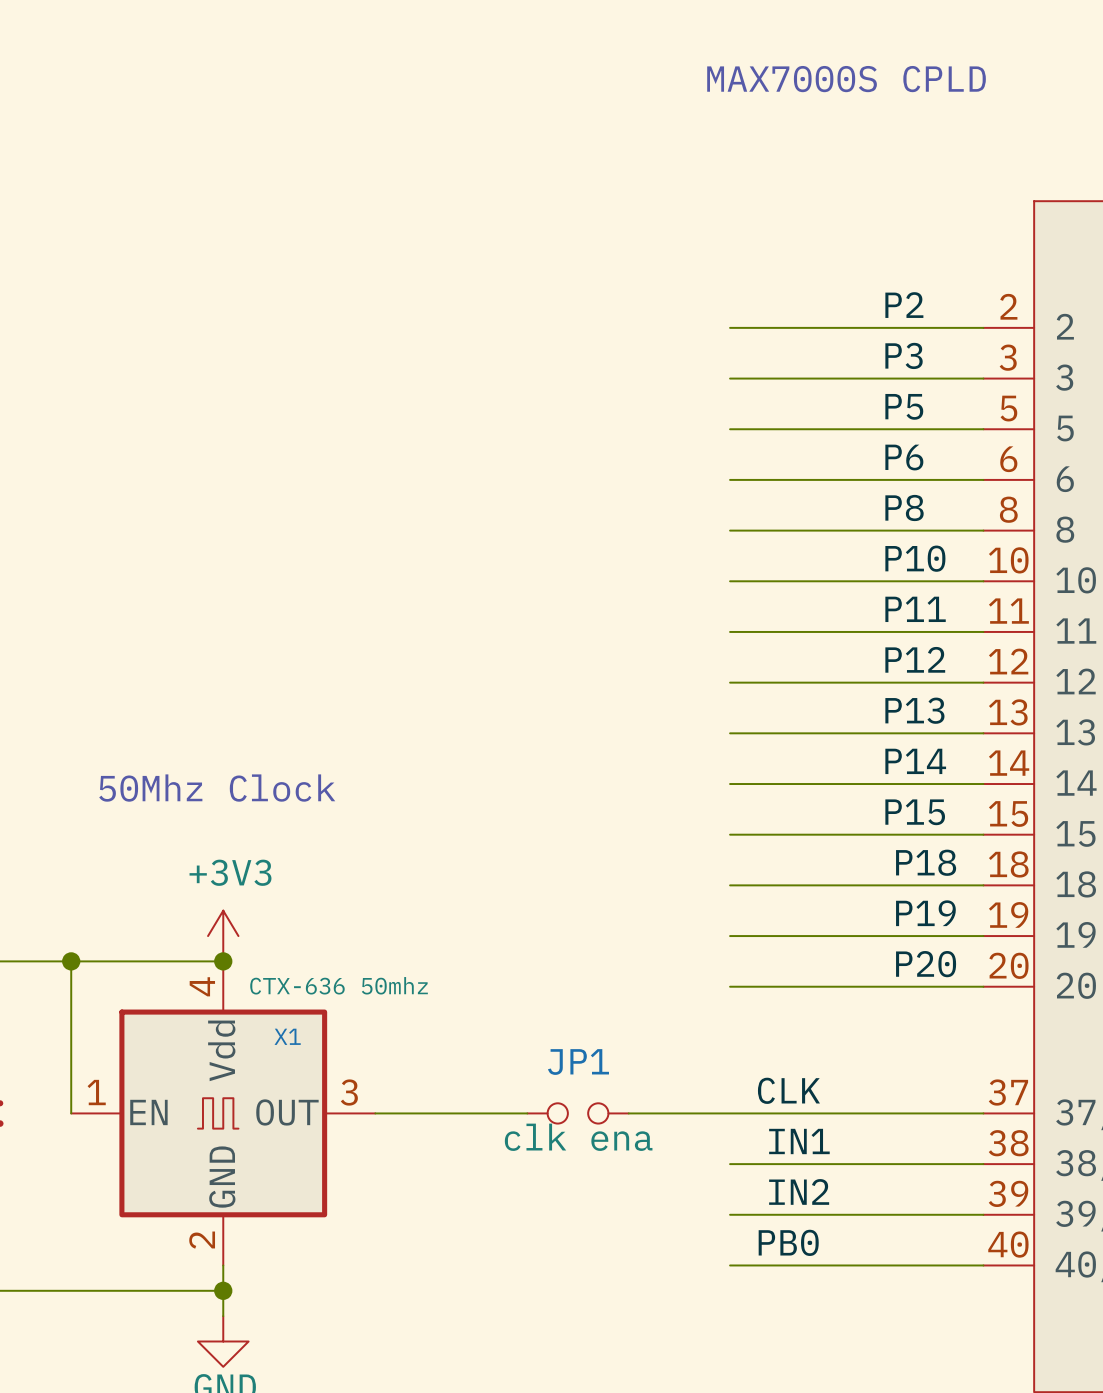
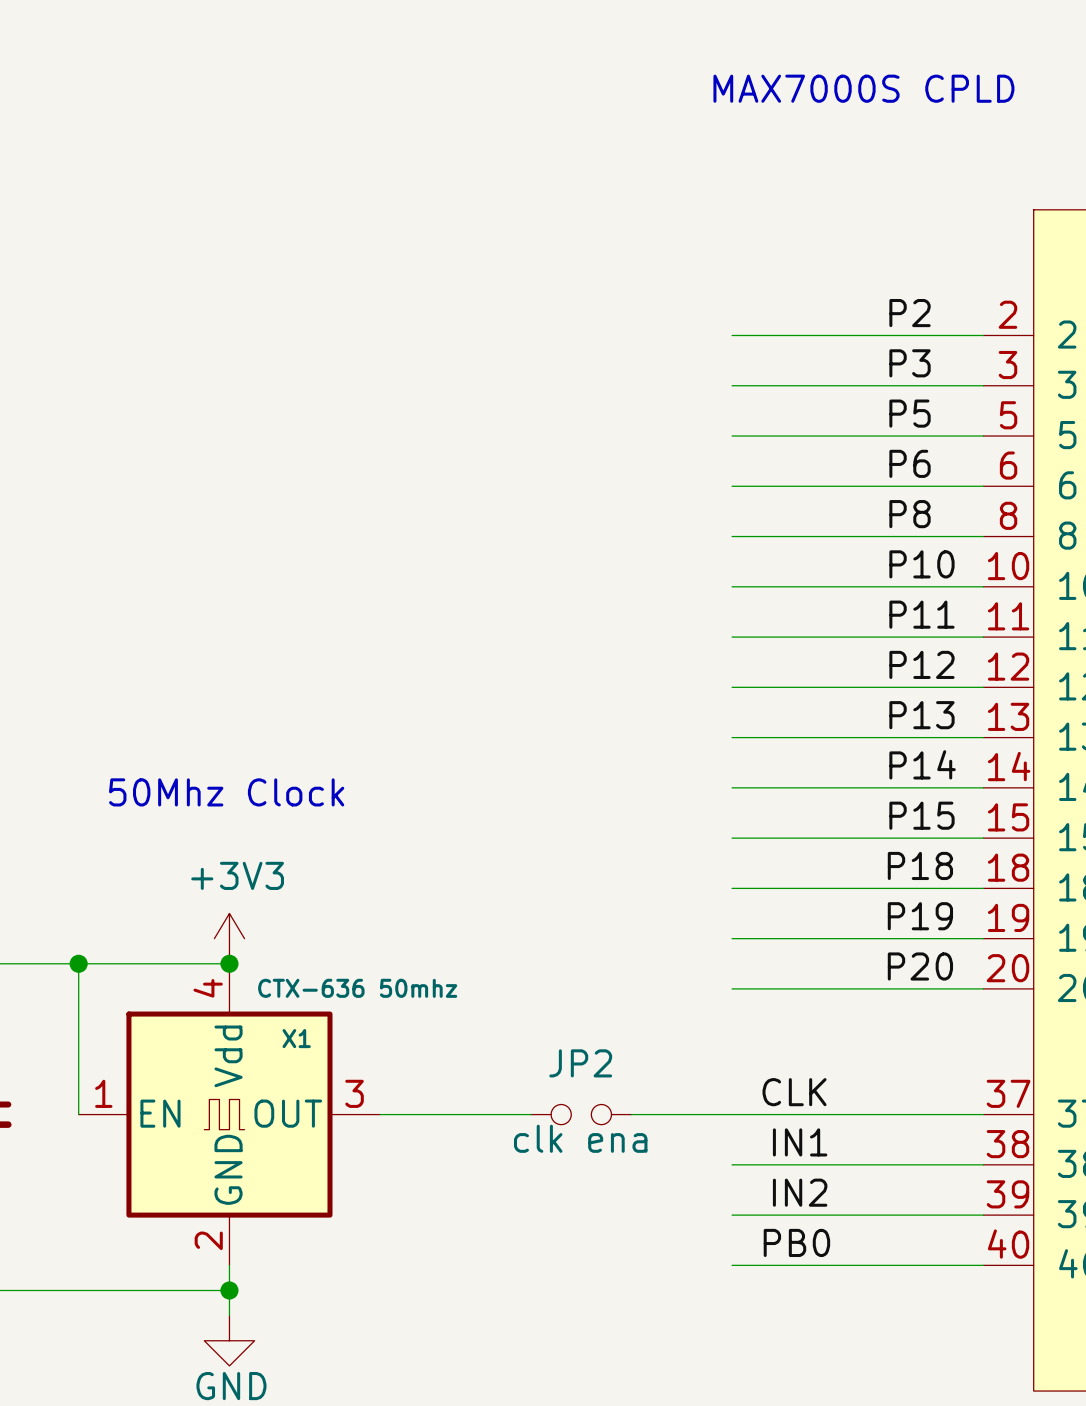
JP1 name: JP1 (578, 1062) -> JP2 (580, 1063)

